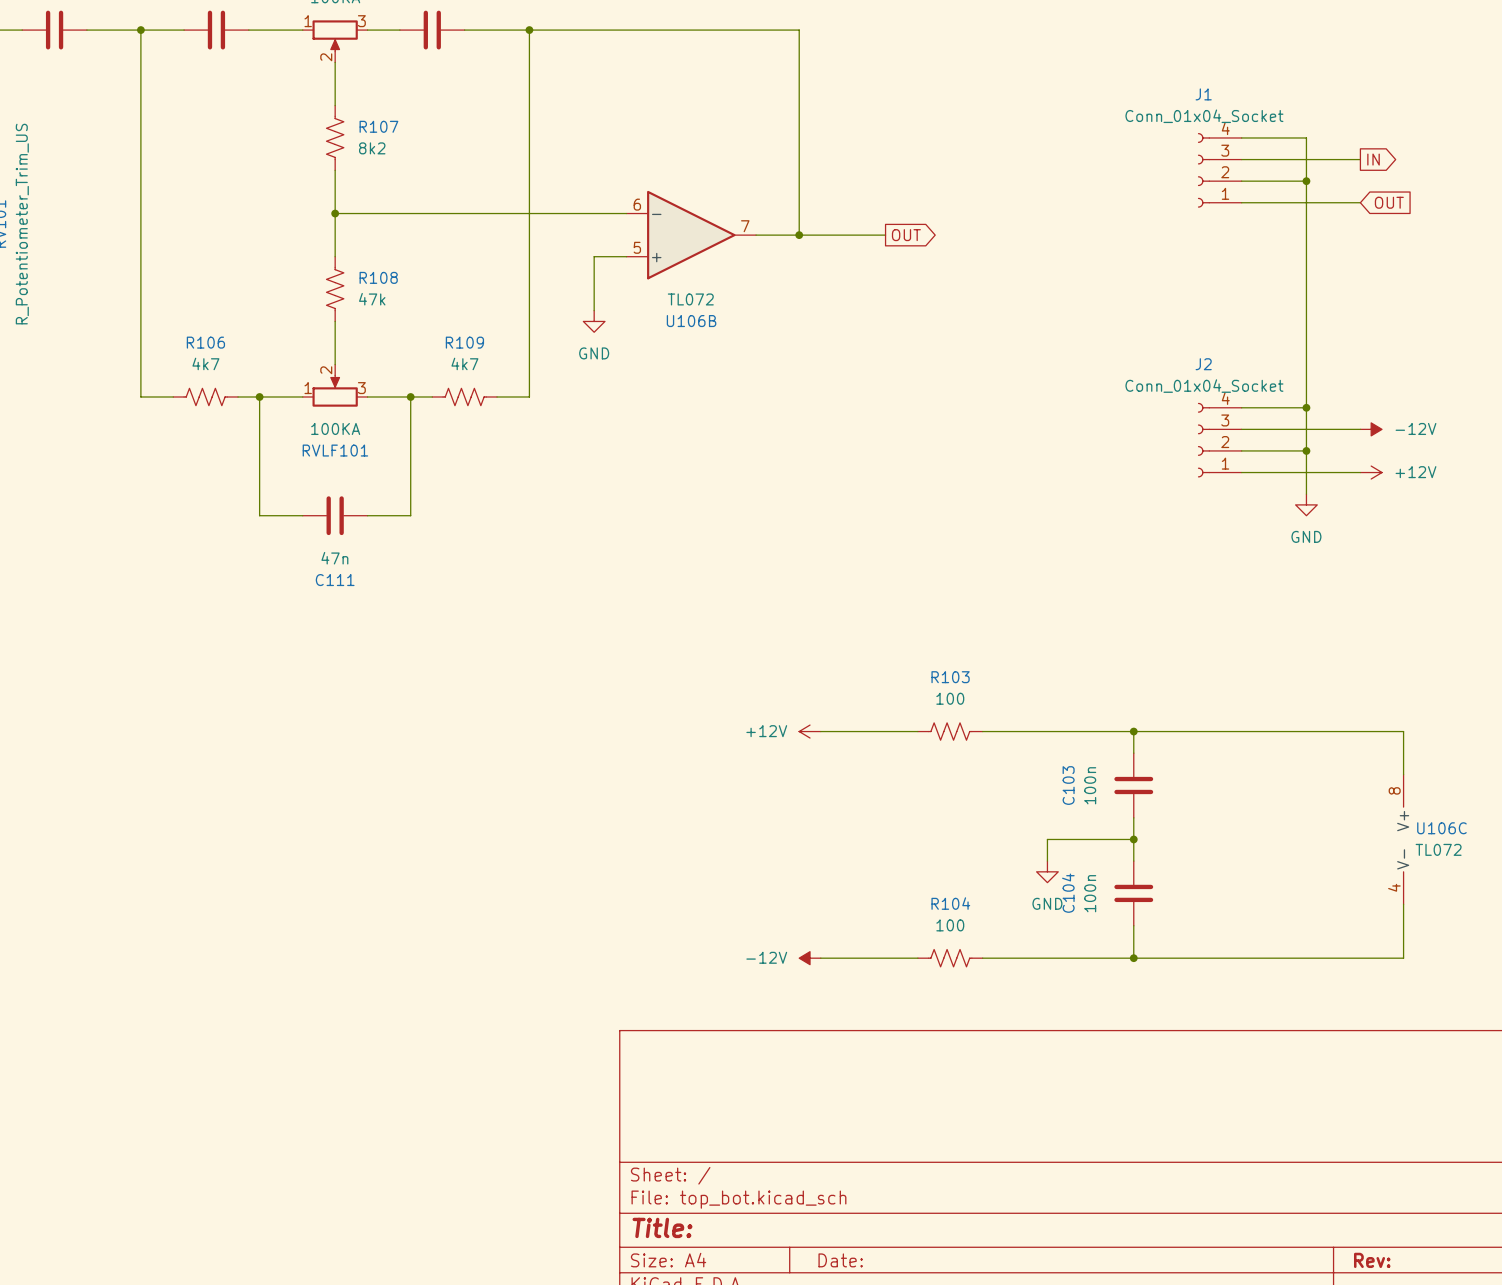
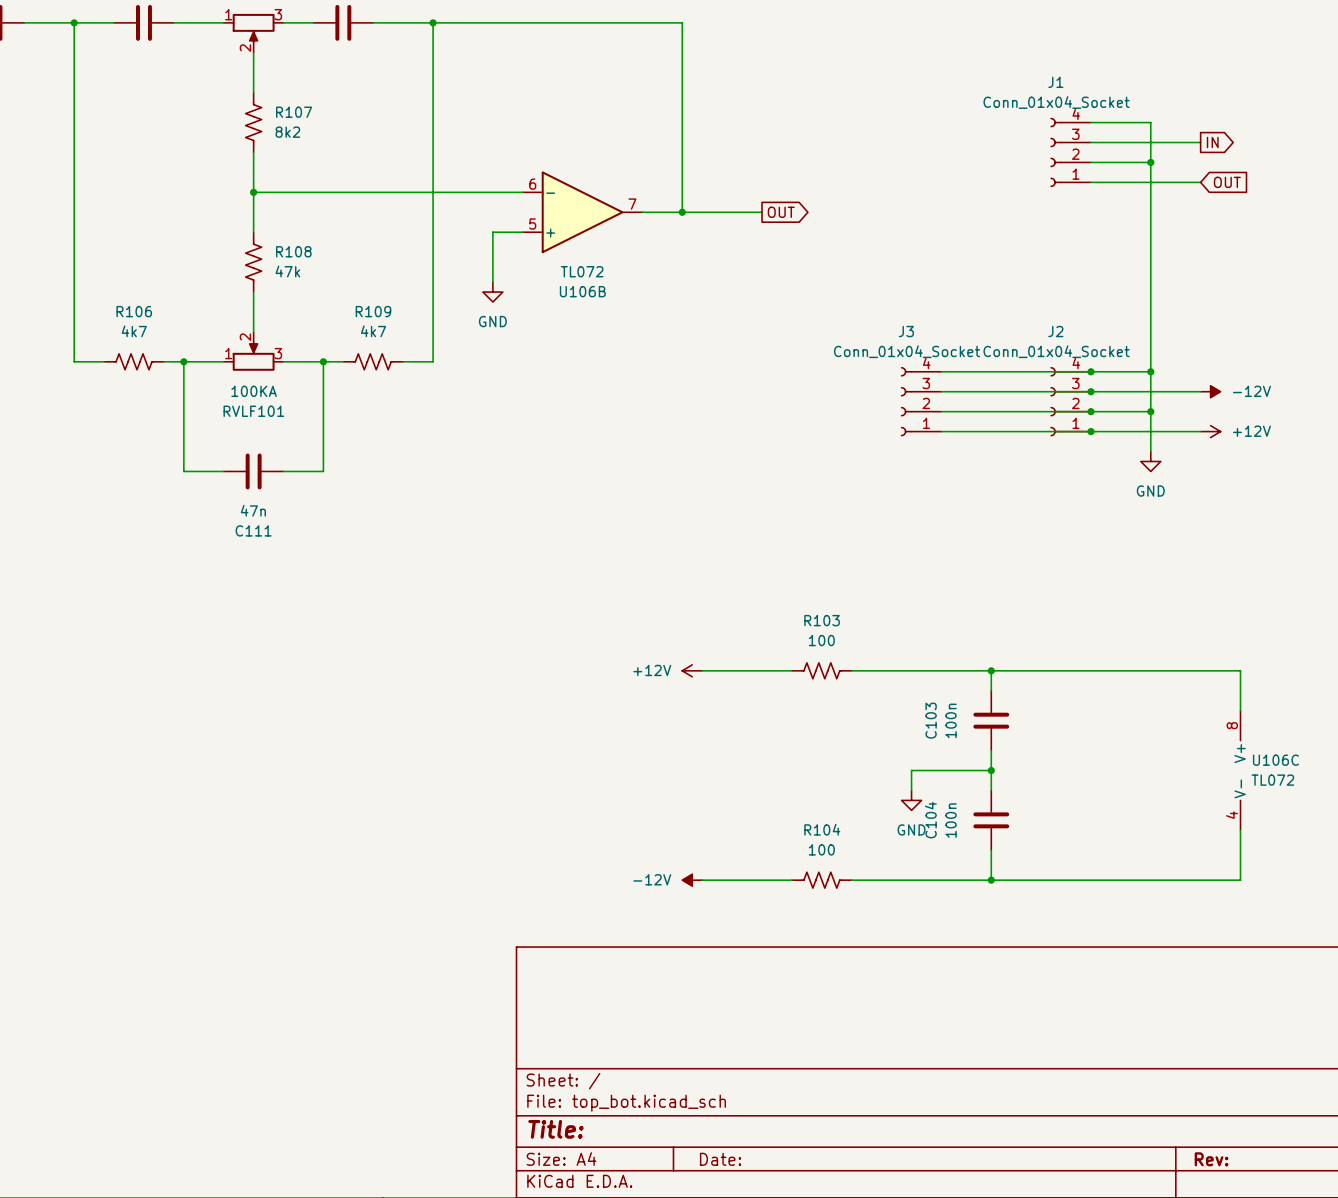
wire: none -> (941, 371) (1090, 371)
junction: none -> (1090, 371)
wire: none -> (941, 391) (1090, 391)
junction: none -> (1090, 391)
J3: none -> Conn_01x04_Socket (921, 401)
wire: none -> (941, 411) (1090, 411)
junction: none -> (1090, 411)
wire: none -> (941, 431) (1090, 431)
junction: none -> (1090, 431)

